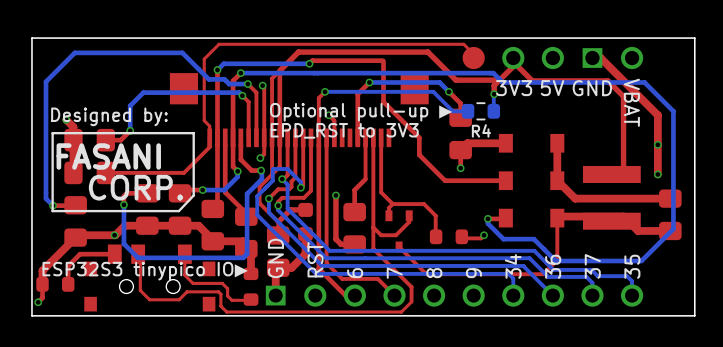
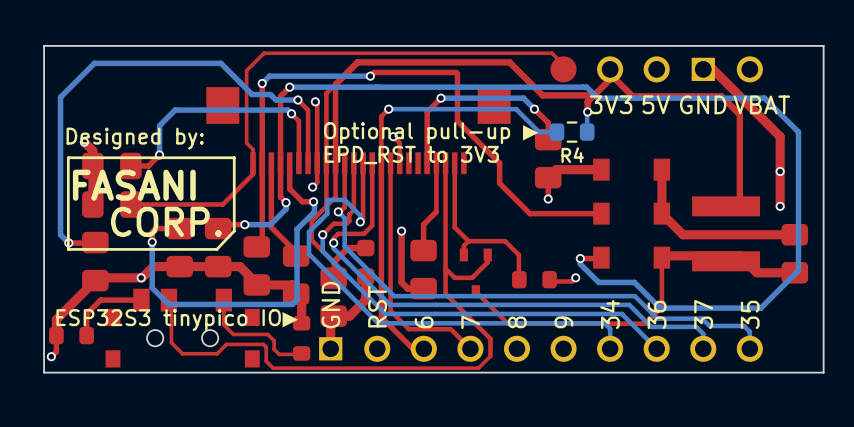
text rotation: 0° (631, 102) -> 90° counterclockwise (761, 104)

